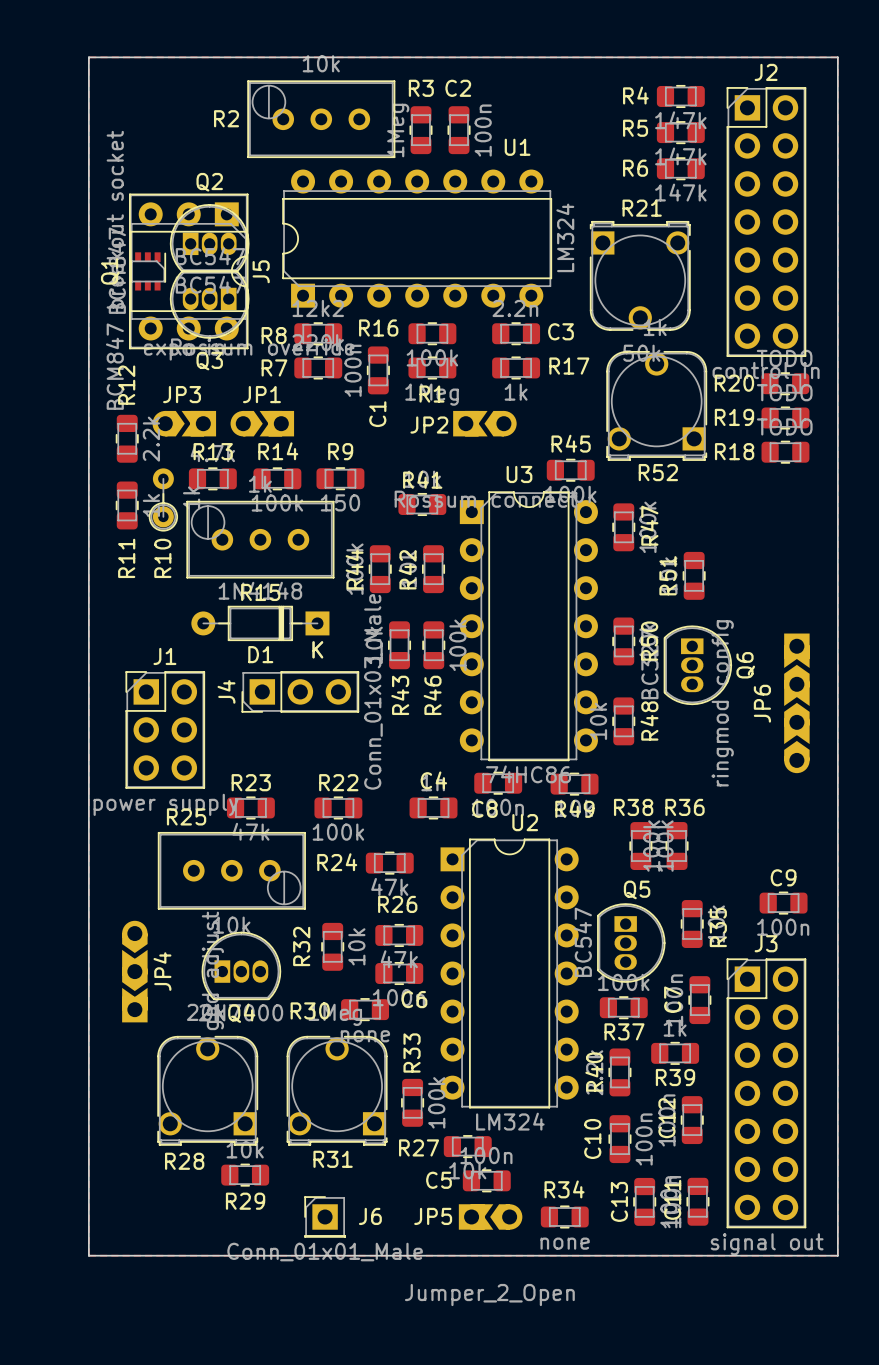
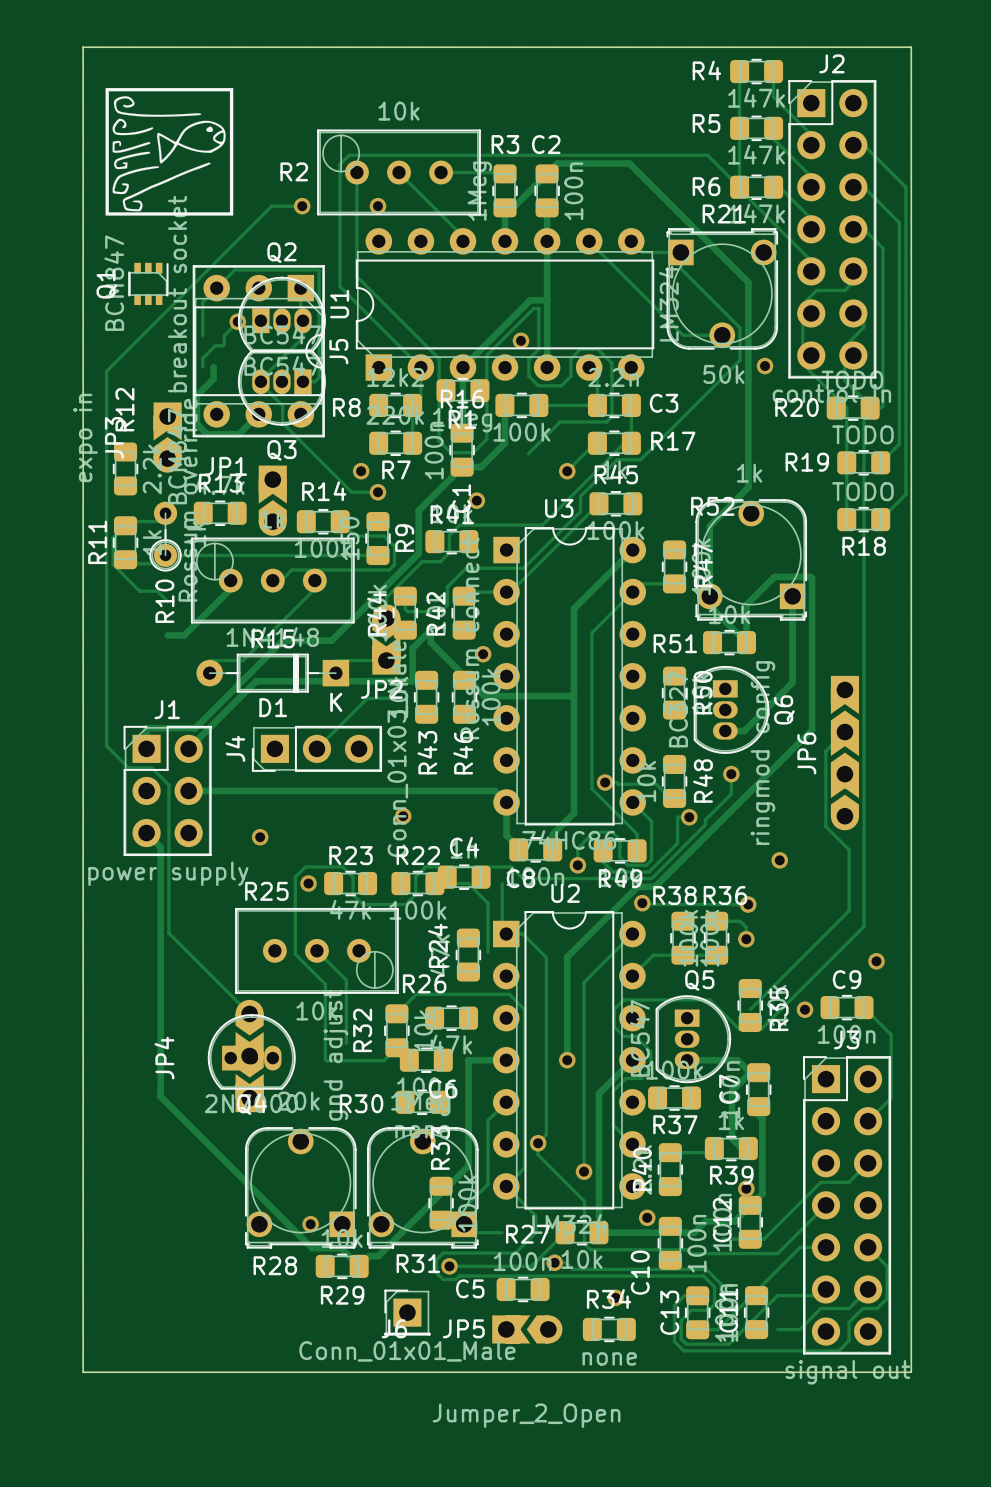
track: none -> (739, 71) (739, 189) (821, 271)
track: none -> (773, 71) (773, 96) (821, 145)
drawing: none -> [105, 87, 234, 216]
R4 position: (680, 96) -> (756, 71)
R2 position: (321, 119) -> (399, 172)
R3 position: (420, 130) -> (505, 190)
C2 position: (459, 130) -> (547, 190)
track: none -> (773, 128) (773, 139) (821, 187)
R5 position: (680, 132) -> (756, 128)
track: none -> (863, 145) (905, 187) (905, 494) (880, 519)
U1 name rotation: 0° (517, 147) -> 90° counterclockwise (339, 304)
U1 name position: U1 (517, 147) -> U1 (339, 304)
R6 position: (680, 168) -> (756, 187)
track: none -> (356, 172) (356, 276) (439, 358) (439, 440) (450, 452) (473, 452) (486, 439) (486, 355) (533, 308) (538, 308) (538, 349) (528, 359) (528, 376) (538, 385) (561, 385) (570, 376) (570, 358) (580, 349) (597, 349) (611, 363) (611, 416) (606, 421) (560, 421) (528, 453)
track: none -> (399, 172) (462, 236) (462, 241)
track: none -> (441, 172) (505, 173)
track: none -> (739, 187) (707, 155) (349, 155) (340, 164) (340, 286) (420, 367) (420, 397) (412, 405) (412, 443)
track: none -> (773, 187) (779, 187) (821, 229)
track: none -> (863, 187) (899, 222) (899, 444) (880, 462)
track: none -> (302, 206) (271, 206) (106, 371) (106, 745) (128, 767) (151, 767) (168, 785) (168, 933) (249, 1013)
via: none -> (302, 206)
via: none -> (377, 206)
track: none -> (547, 207) (547, 367)
track: none -> (863, 229) (882, 248) (882, 405) (880, 408)
track: none -> (505, 241) (505, 207) (513, 207) (557, 163) (629, 163) (748, 282) (748, 487) (709, 526) (709, 605) (746, 642) (746, 604) (774, 576) (812, 578) (812, 729) (655, 886) (637, 886) (567, 957) (567, 1060)
track: none -> (589, 241) (683, 335) (722, 335)
track: none -> (631, 241) (642, 252) (680, 252) (680, 268) (740, 327) (740, 360) (640, 459) (617, 459) (580, 496) (580, 511) (523, 568) (466, 568) (447, 587) (447, 605) (441, 611) (407, 611) (405, 609) (405, 597)
Q2 position: (209, 238) -> (281, 314)
U1 position: (417, 238) -> (505, 304)
track: none -> (863, 271) (844, 290) (816, 290) (802, 304) (802, 364) (846, 408) (846, 519)
J5 position: (188, 271) -> (258, 351)
track: none -> (300, 288) (302, 337) (268, 372) (268, 391) (282, 405) (282, 423) (351, 492) (377, 492)
R21 position: (640, 275) -> (722, 288)
track: none -> (547, 300) (530, 300) (462, 367) (462, 433)
track: none -> (863, 313) (863, 327) (844, 346) (844, 380) (863, 399) (863, 926) (761, 1029) (739, 1029) (709, 999) (623, 999) (614, 1009) (614, 1026) (623, 1036) (635, 1036) (650, 1051) (650, 1068) (641, 1078) (625, 1078) (613, 1090) (613, 1125) (632, 1144)
Q3 position: (209, 304) -> (281, 387)
track: none -> (237, 322) (224, 335) (224, 344) (215, 345) (202, 358) (202, 366)
via: none -> (237, 321)
track: none -> (202, 335) (202, 302) (234, 269) (318, 269) (319, 377) (314, 381) (302, 381)
via: none -> (521, 340)
R8 position: (318, 333) -> (395, 405)
R16 position: (432, 333) -> (521, 405)
C3 position: (516, 333) -> (614, 405)
via: none -> (765, 366)
track: none -> (213, 366) (213, 379) (196, 395) (196, 423) (207, 434) (238, 434) (258, 414)
track: none -> (589, 367) (597, 375) (597, 405) (538, 405)
R7 name position: R7 (274, 367) -> R7 (396, 469)
R7 position: (318, 367) -> (395, 443)
R17 position: (516, 367) -> (614, 443)
C1 position: (378, 370) -> (462, 450)
track: none -> (504, 405) (504, 443) (481, 467) (462, 467) (418, 510) (418, 553) (331, 640) (282, 640) (195, 728) (146, 728) (146, 748)
track: none -> (631, 405) (631, 443) (624, 443) (542, 525) (459, 525) (449, 535) (449, 552) (440, 561) (422, 561) (386, 597) (386, 618)
JP1 name position: JP1 (261, 394) -> JP1 (226, 466)
R52 position: (656, 405) -> (751, 559)
track: none -> (597, 443) (595, 443) (567, 471)
R19 position: (785, 417) -> (863, 462)
JP3 rotation: 0° (184, 423) -> 90° counterclockwise (167, 437)
JP1 rotation: 0° (262, 423) -> 90° counterclockwise (272, 500)
JP1 position: (262, 423) -> (272, 500)
JP2 rotation: 0° (484, 423) -> 90° counterclockwise (386, 639)
JP2 position: (484, 423) -> (386, 639)
via: none -> (361, 471)
via: none -> (567, 471)
R18 name position: R18 (734, 451) -> R18 (864, 546)
R18 position: (785, 452) -> (863, 519)
via: none -> (377, 492)
via: none -> (476, 500)
track: none -> (598, 503) (510, 592) (472, 592) (468, 596)
R14 position: (277, 478) -> (323, 521)
R9 rotation: 0° (340, 478) -> 90° clockwise (377, 538)
track: none -> (167, 521) (129, 521) (113, 538) (113, 564) (139, 591) (157, 591) (167, 601)
track: none -> (340, 521) (354, 536) (384, 536) (394, 546) (394, 564) (389, 570) (291, 570) (272, 589)
track: none -> (632, 550) (574, 608) (574, 813) (552, 834) (552, 847)
track: none -> (129, 555) (138, 563) (167, 563) (175, 555) (377, 555)
track: none -> (670, 583) (641, 583) (591, 632) (591, 788) (637, 834) (637, 848)
track: none -> (230, 589) (184, 635) (167, 635)
track: none -> (314, 589) (243, 660) (209, 660)
track: none -> (792, 596) (792, 682) (744, 730) (725, 730)
R11 name position: R11 (126, 558) -> R11 (97, 542)
R51 rotation: 0° (694, 575) -> 90° clockwise (729, 642)
via: none -> (483, 654)
track: none -> (335, 660) (386, 660)
track: none -> (574, 693) (571, 696) (484, 696) (430, 642) (430, 630) (412, 648) (411, 681) (256, 681) (188, 748)
track: none -> (401, 698) (367, 698) (316, 748)
Q6 position: (697, 665) -> (731, 709)
track: none -> (844, 732) (825, 751) (825, 826) (849, 849) (849, 910) (750, 1009)
JP6 position: (796, 703) -> (844, 753)
track: none -> (731, 774) (731, 794) (705, 819) (705, 824) (651, 878) (522, 878) (511, 866) (425, 866)
via: none -> (731, 774)
track: none -> (605, 782) (656, 784) (670, 798)
via: none -> (605, 782)
track: none -> (188, 790) (495, 790) (506, 802) (506, 835) (518, 847)
track: none -> (632, 802) (651, 821) (651, 859) (646, 865) (627, 865) (619, 857) (619, 839) (612, 832) (594, 832) (577, 848) (577, 865)
via: none -> (403, 816)
track: none -> (689, 817) (677, 817) (677, 843) (649, 871) (613, 871) (603, 862) (603, 848)
via: none -> (689, 817)
track: none -> (146, 833) (160, 847) (160, 1096) (312, 1248) (340, 1248) (359, 1266) (369, 1256) (378, 1256) (468, 1165) (468, 1060) (506, 1060)
via: none -> (260, 837)
via: none -> (779, 860)
via: none -> (577, 865)
track: none -> (426, 866) (415, 876) (415, 894) (405, 904) (362, 904) (353, 894) (353, 877) (342, 866) (305, 866) (295, 877) (295, 954) (325, 984) (325, 1059) (327, 1060) (383, 1060) (396, 1047)
R23 position: (250, 807) -> (350, 883)
R22 position: (338, 807) -> (417, 883)
via: none -> (308, 883)
track: none -> (434, 883) (468, 883) (488, 903) (488, 952)
track: none -> (502, 883) (502, 929) (506, 934) (522, 934) (546, 957) (546, 1134) (538, 1143) (538, 1154) (584, 1201) (584, 1243) (590, 1249) (687, 1249) (691, 1253) (777, 1253) (826, 1205)
track: none -> (642, 903) (748, 904)
via: none -> (642, 903)
via: none -> (748, 904)
R38 position: (640, 846) -> (682, 938)
R36 position: (677, 846) -> (716, 938)
track: none -> (716, 921) (740, 921) (746, 927) (746, 939)
R24 rotation: 0° (389, 863) -> 90° clockwise (468, 955)
R24 position: (389, 863) -> (468, 955)
via: none -> (746, 939)
track: none -> (640, 942) (632, 934) (584, 982) (584, 1171)
R25 position: (231, 870) -> (316, 950)
track: none -> (316, 950) (346, 980) (346, 1043)
track: none -> (716, 955) (653, 955) (632, 976)
via: none -> (876, 961)
C9 position: (783, 903) -> (847, 1007)
track: none -> (864, 1007) (891, 1034) (891, 1098) (868, 1121)
via: none -> (804, 1009)
track: none -> (396, 1013) (416, 994) (509, 994) (524, 1009) (524, 1168) (506, 1186) (535, 1216) (535, 1232) (515, 1253) (443, 1253) (436, 1259) (436, 1272) (443, 1279) (455, 1279) (459, 1276) (703, 1276) (714, 1286) (714, 1304) (708, 1310) (691, 1310) (681, 1320) (681, 1338) (686, 1344) (729, 1344) (777, 1295) (819, 1295) (826, 1289)
R26 position: (399, 935) -> (451, 1018)
Q5 position: (631, 943) -> (693, 1039)
R32 position: (332, 946) -> (396, 1030)
JP4 position: (134, 971) -> (249, 1056)
U2 position: (509, 973) -> (569, 1060)
via: none -> (567, 1060)
track: none -> (632, 1060) (598, 1093) (598, 1232) (694, 1232) (705, 1221) (734, 1221) (762, 1193) (762, 1118) (750, 1106)
track: none -> (687, 1060) (737, 1060) (750, 1072) (732, 1090) (732, 1138) (746, 1152)
R30 position: (365, 1009) -> (422, 1102)
track: none -> (506, 1102) (488, 1120) (488, 1184) (464, 1208) (464, 1224) (472, 1232) (501, 1232)
via: none -> (538, 1143)
track: none -> (670, 1152) (712, 1152)
track: none -> (868, 1163) (849, 1182) (820, 1182) (764, 1239) (722, 1239)
via: none -> (584, 1171)
via: none -> (746, 1188)
R28 position: (207, 1090) -> (300, 1187)
R31 position: (337, 1090) -> (422, 1187)
J3 position: (766, 1093) -> (847, 1205)
via: none -> (647, 1217)
via: none -> (310, 1224)
track: none -> (565, 1232) (531, 1266) (449, 1266)
C10 name position: C10 (592, 1138) -> C10 (640, 1272)
track: none -> (826, 1247) (800, 1247) (717, 1329) (697, 1329)
track: none -> (868, 1247) (887, 1266) (887, 1298) (877, 1308) (862, 1308) (849, 1322) (849, 1340) (838, 1350) (683, 1350) (674, 1341) (674, 1305) (684, 1295) (697, 1295)
R27 position: (467, 1146) -> (581, 1232)
track: none -> (554, 1262) (566, 1262) (573, 1269) (706, 1269) (721, 1284) (721, 1326)
via: none -> (554, 1262)
via: none -> (449, 1266)
R29 position: (245, 1175) -> (342, 1266)
track: none -> (868, 1289) (849, 1308) (820, 1308) (799, 1329) (777, 1329)
via: none -> (615, 1297)
J6 position: (325, 1216) -> (407, 1312)

